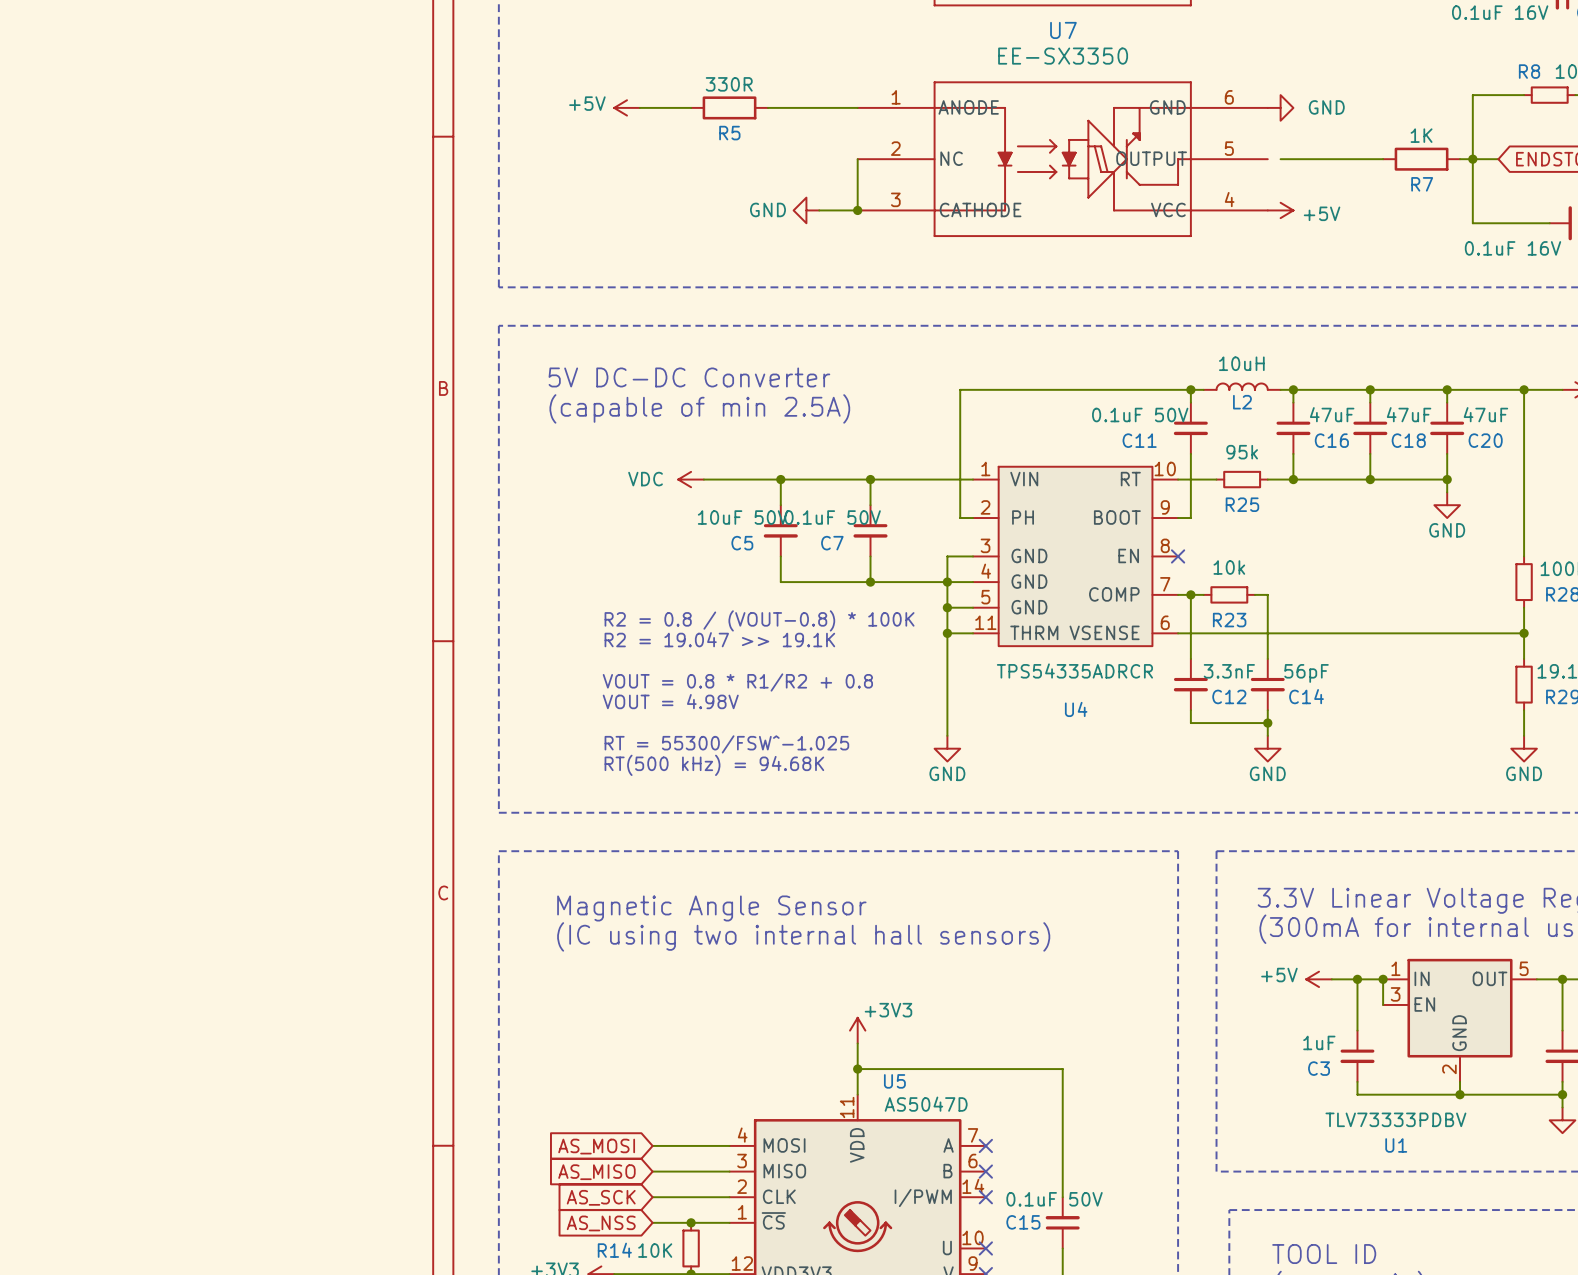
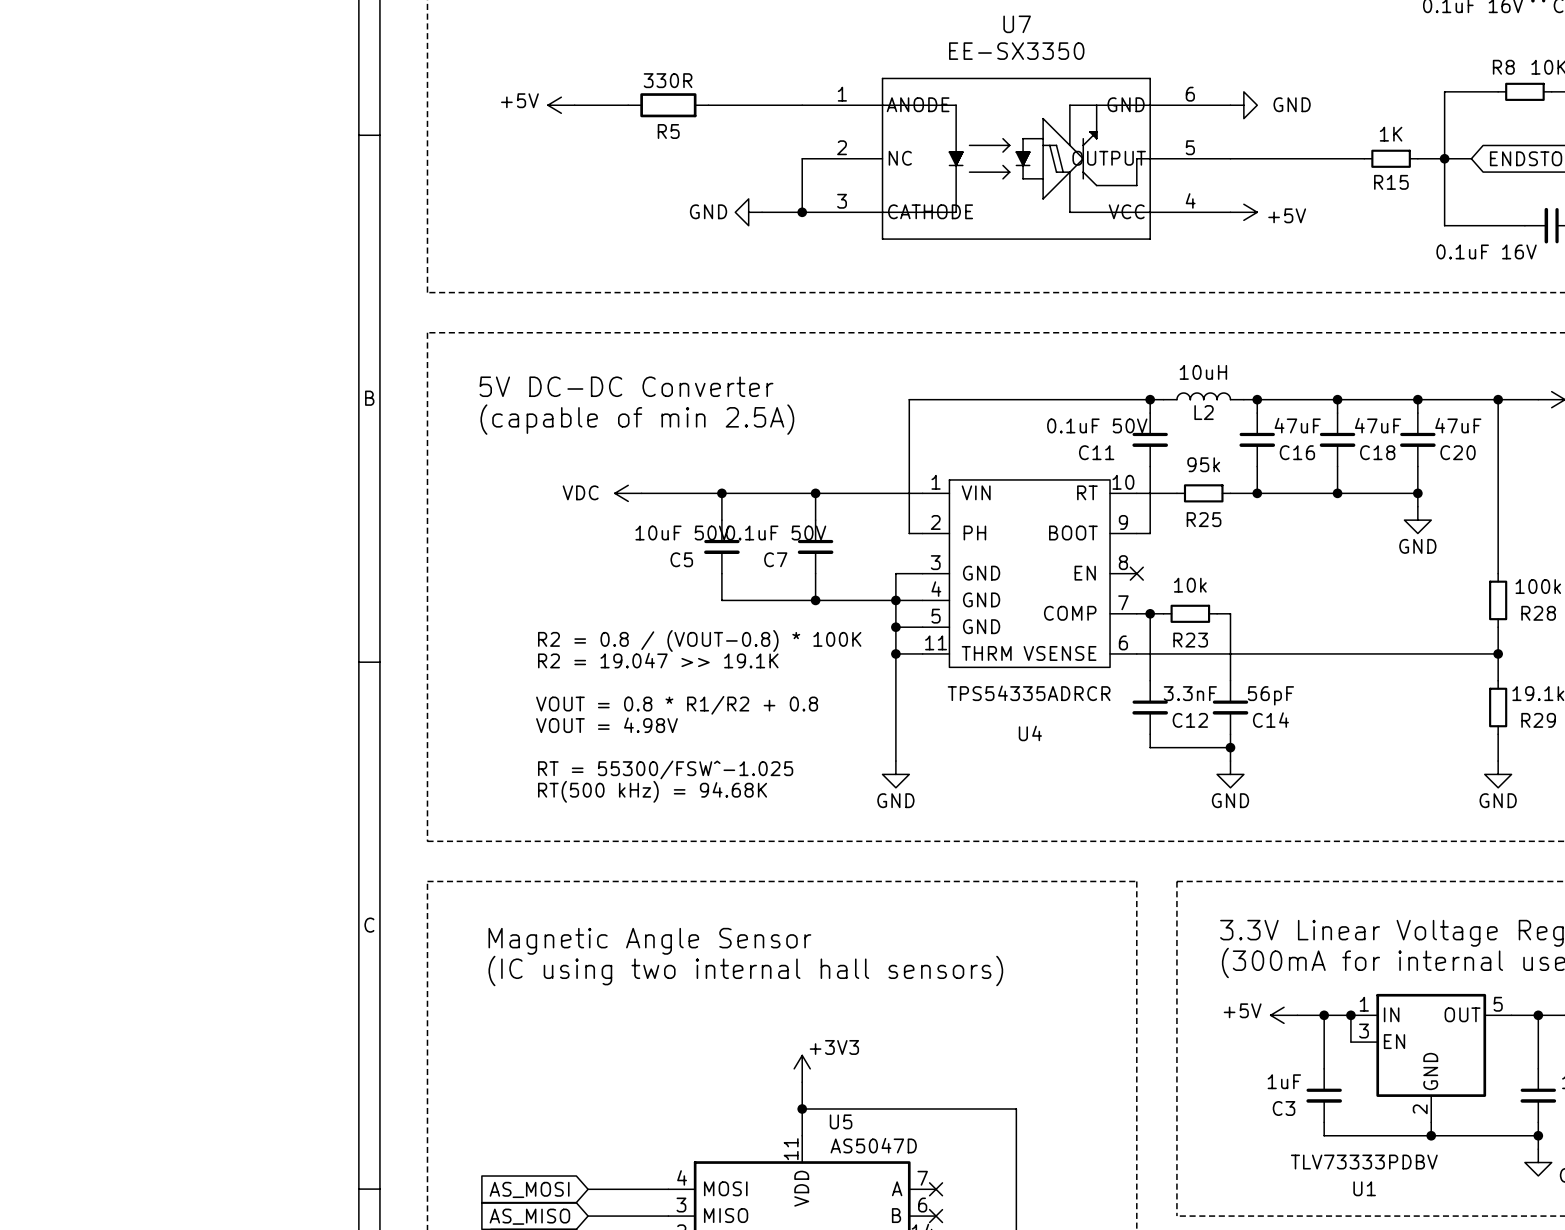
wire: none -> (1230, 158) (1243, 158)
R7: 1K (1421, 159) -> none
R15: none -> 1K (1391, 158)

